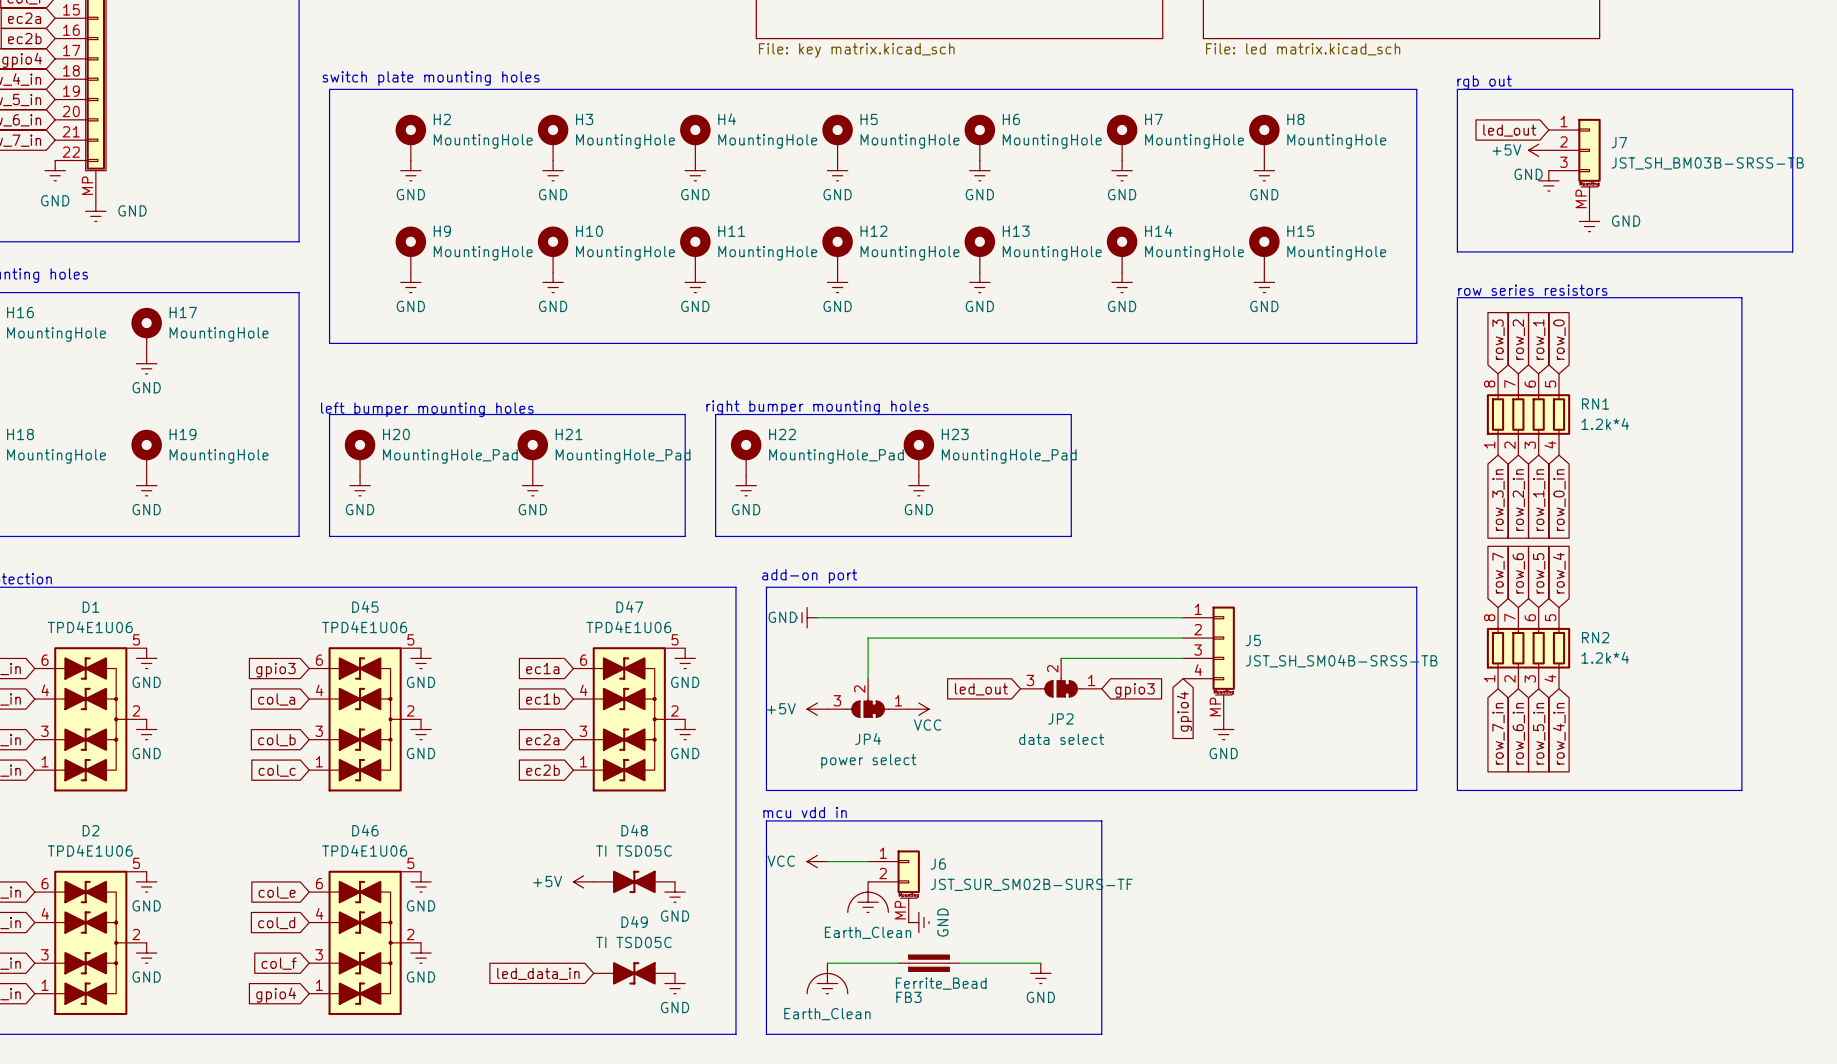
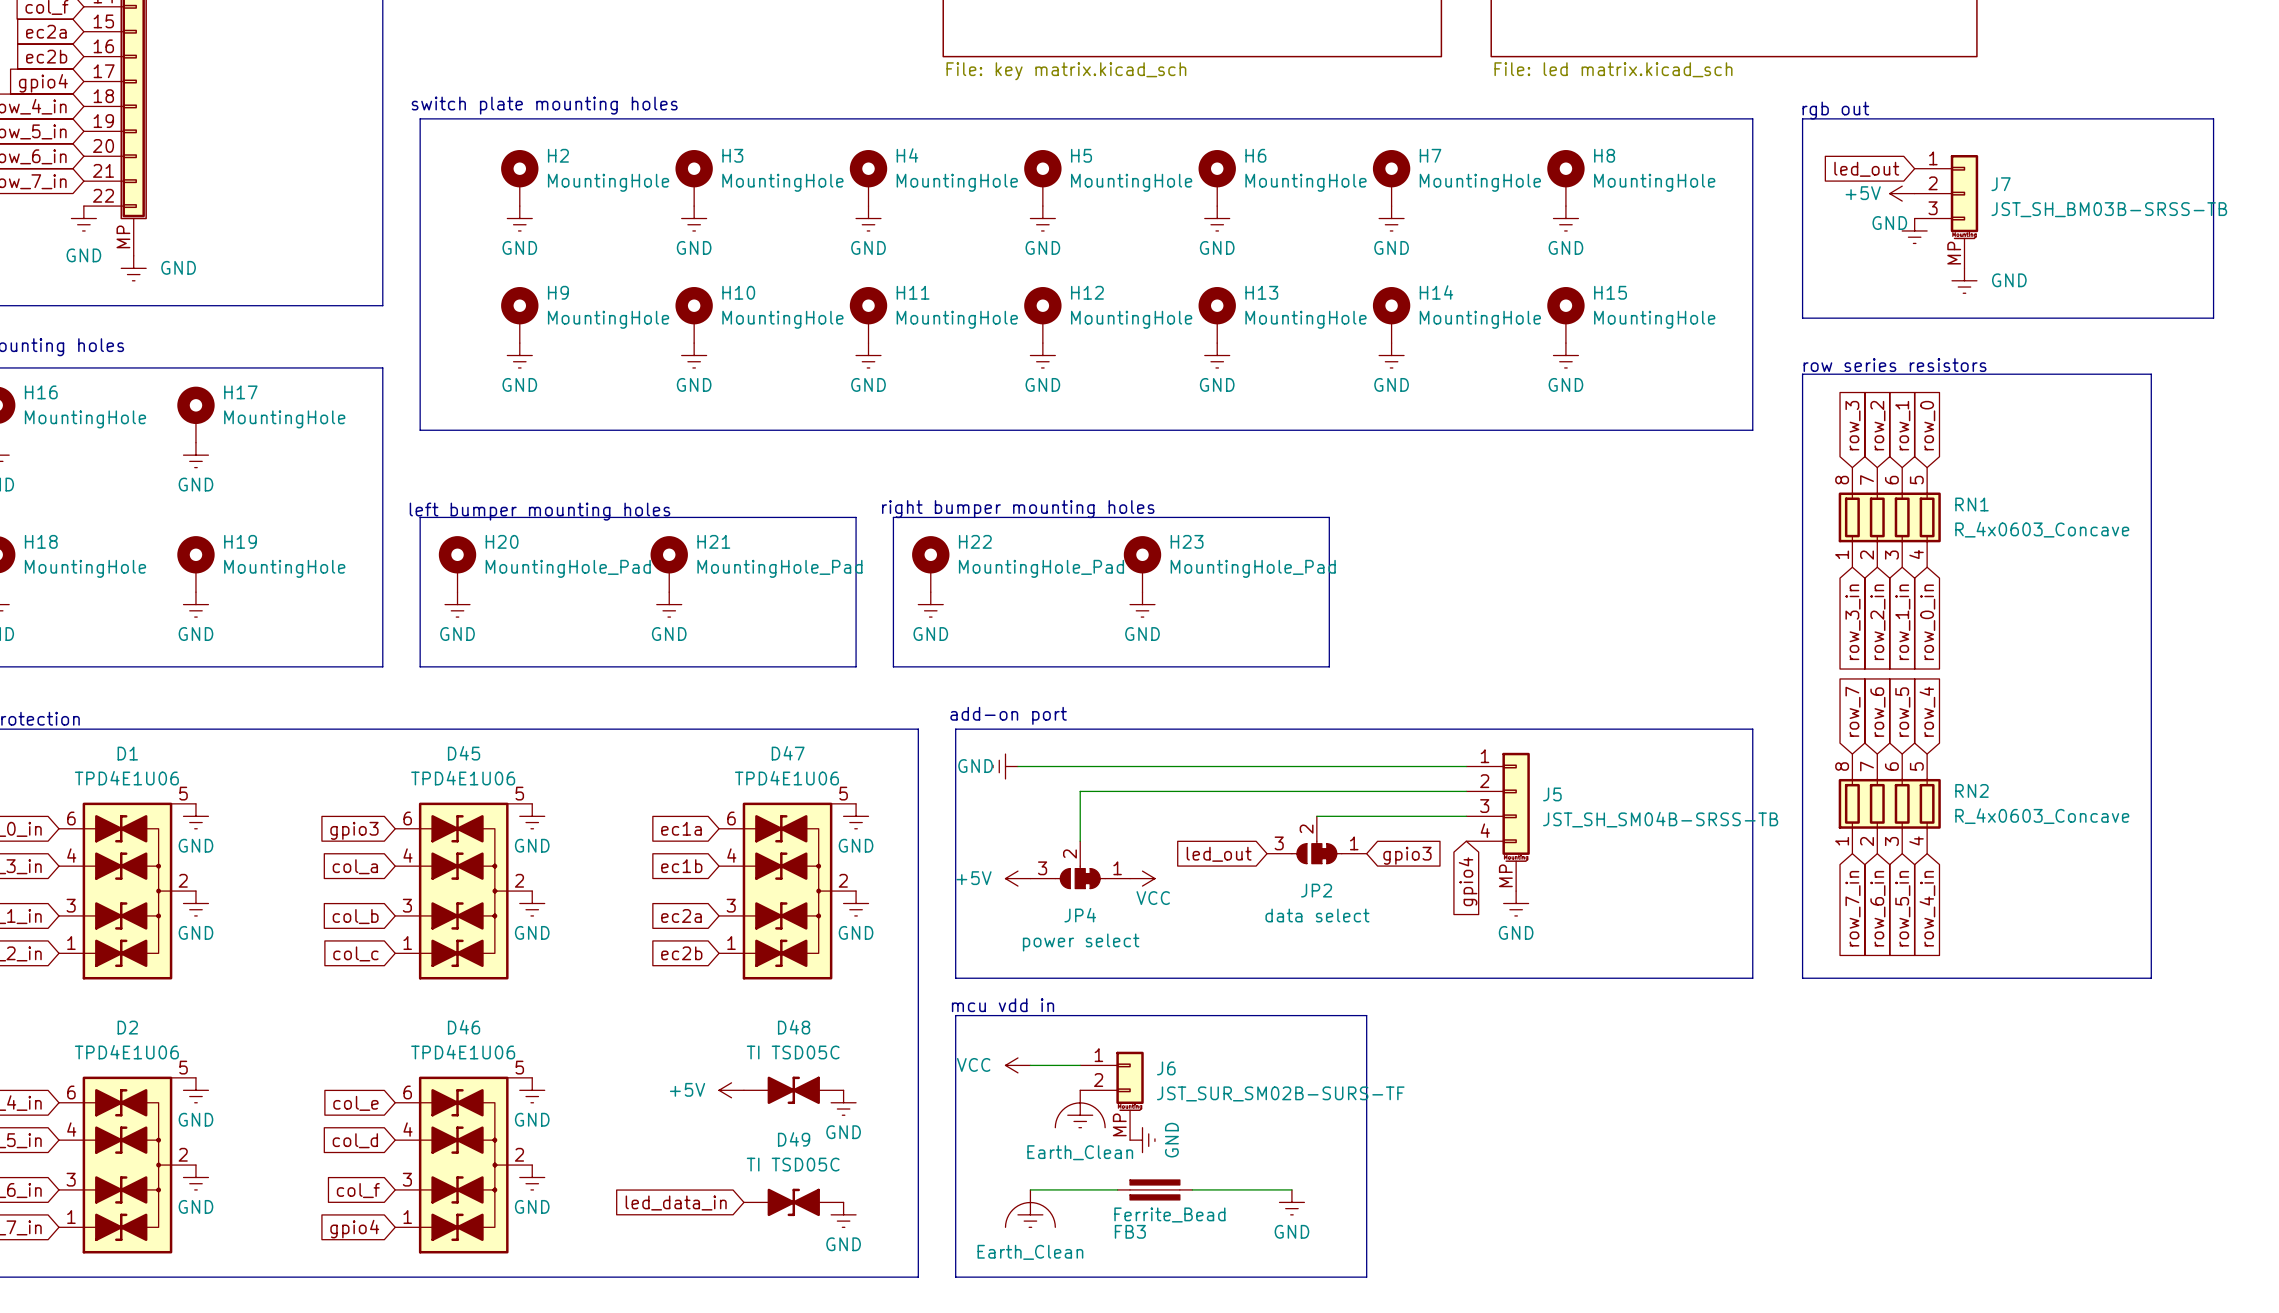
RN1 value: 1.2k*4 (1605, 424) -> R_4x0603_Concave (2042, 529)
RN2 value: 1.2k*4 (1605, 657) -> R_4x0603_Concave (2042, 816)

